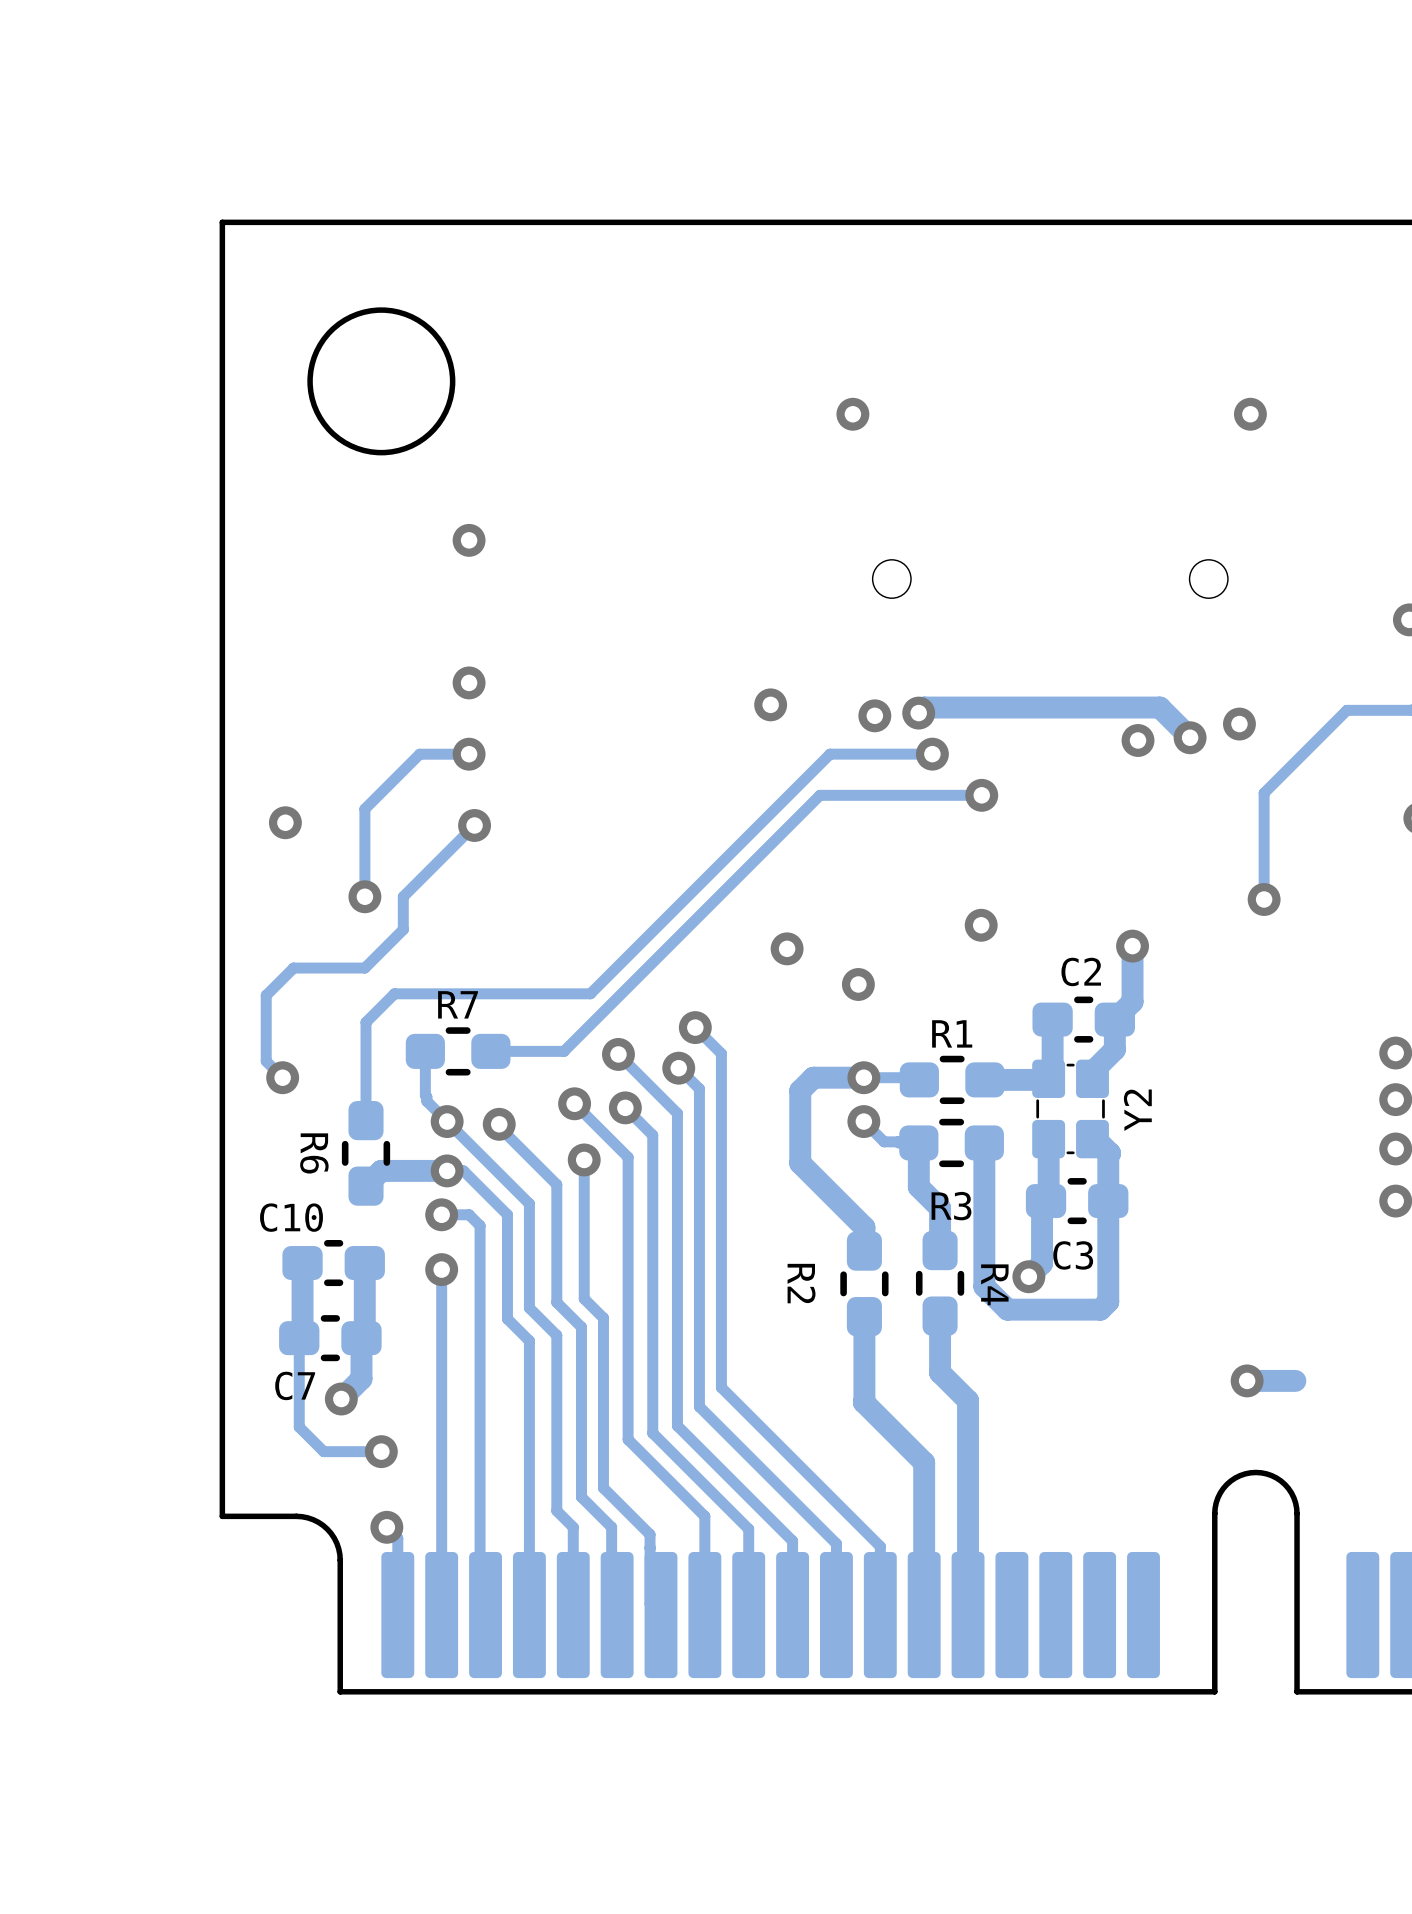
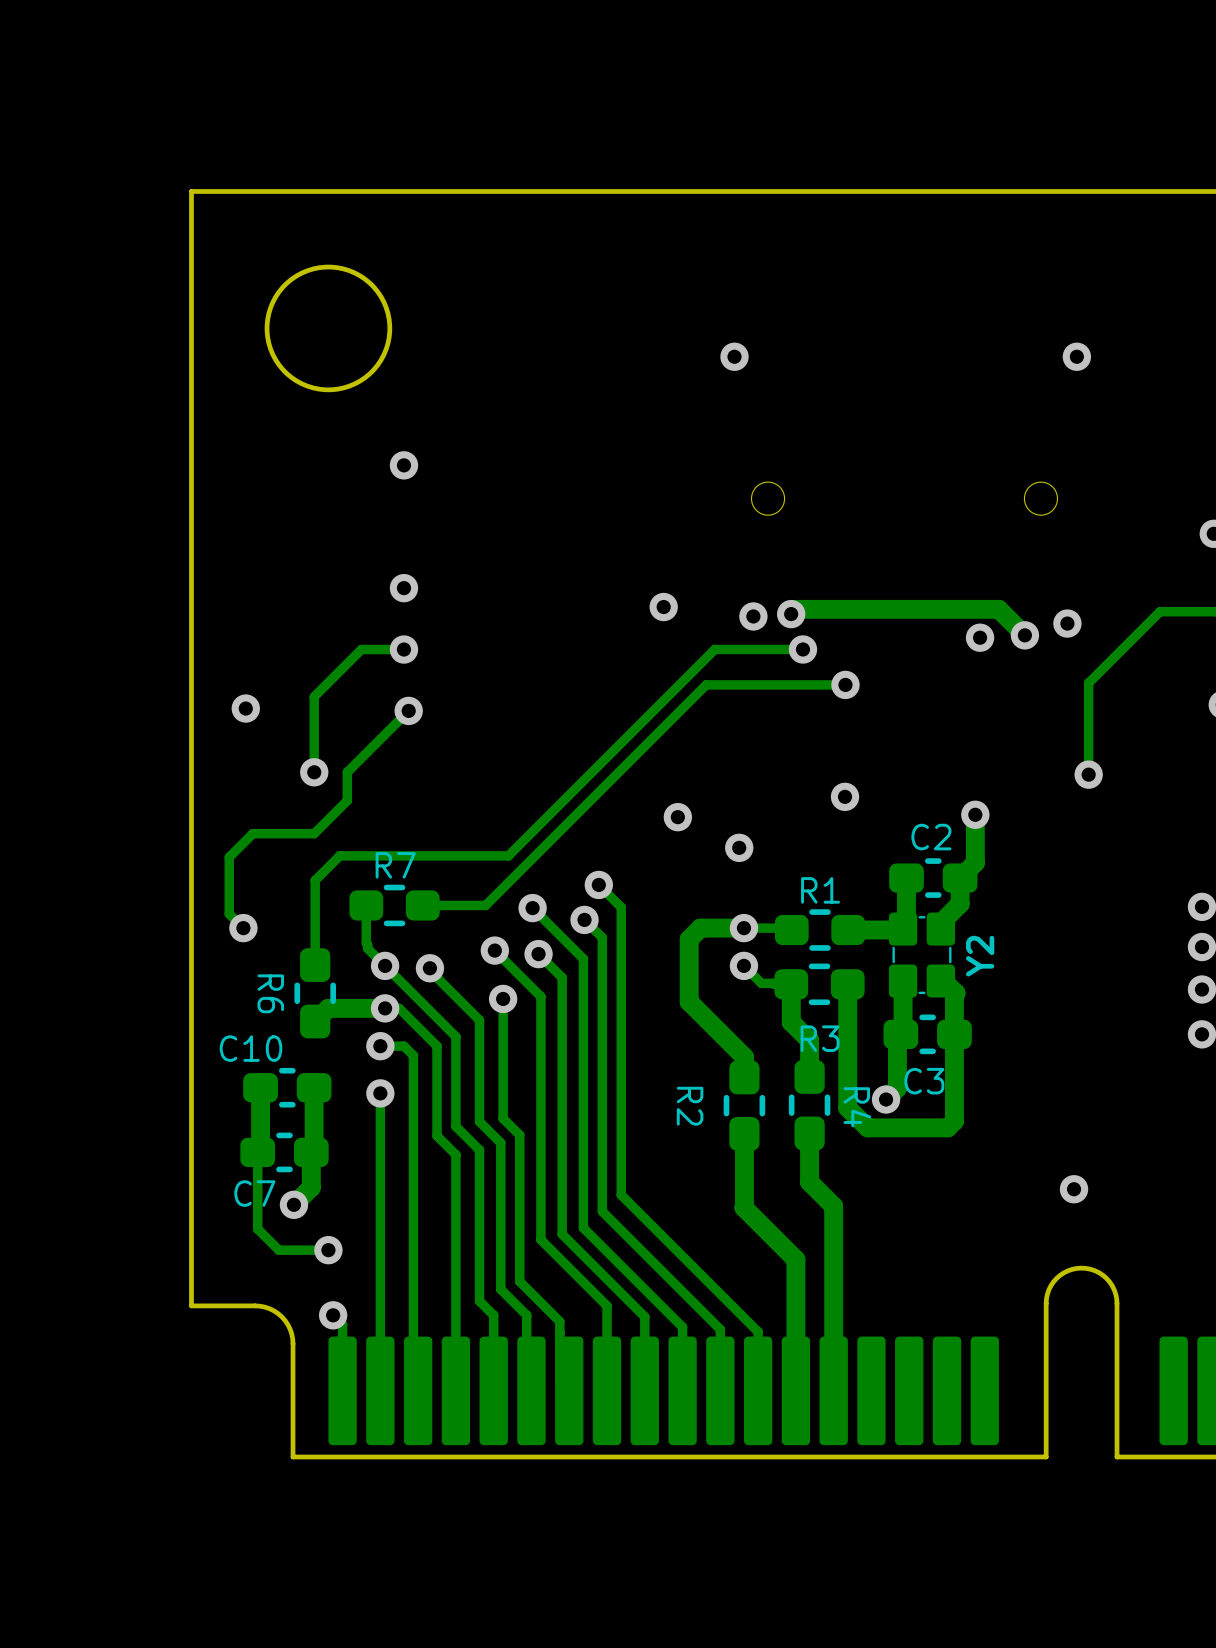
track: (1295, 1380) (1247, 1380) -> none

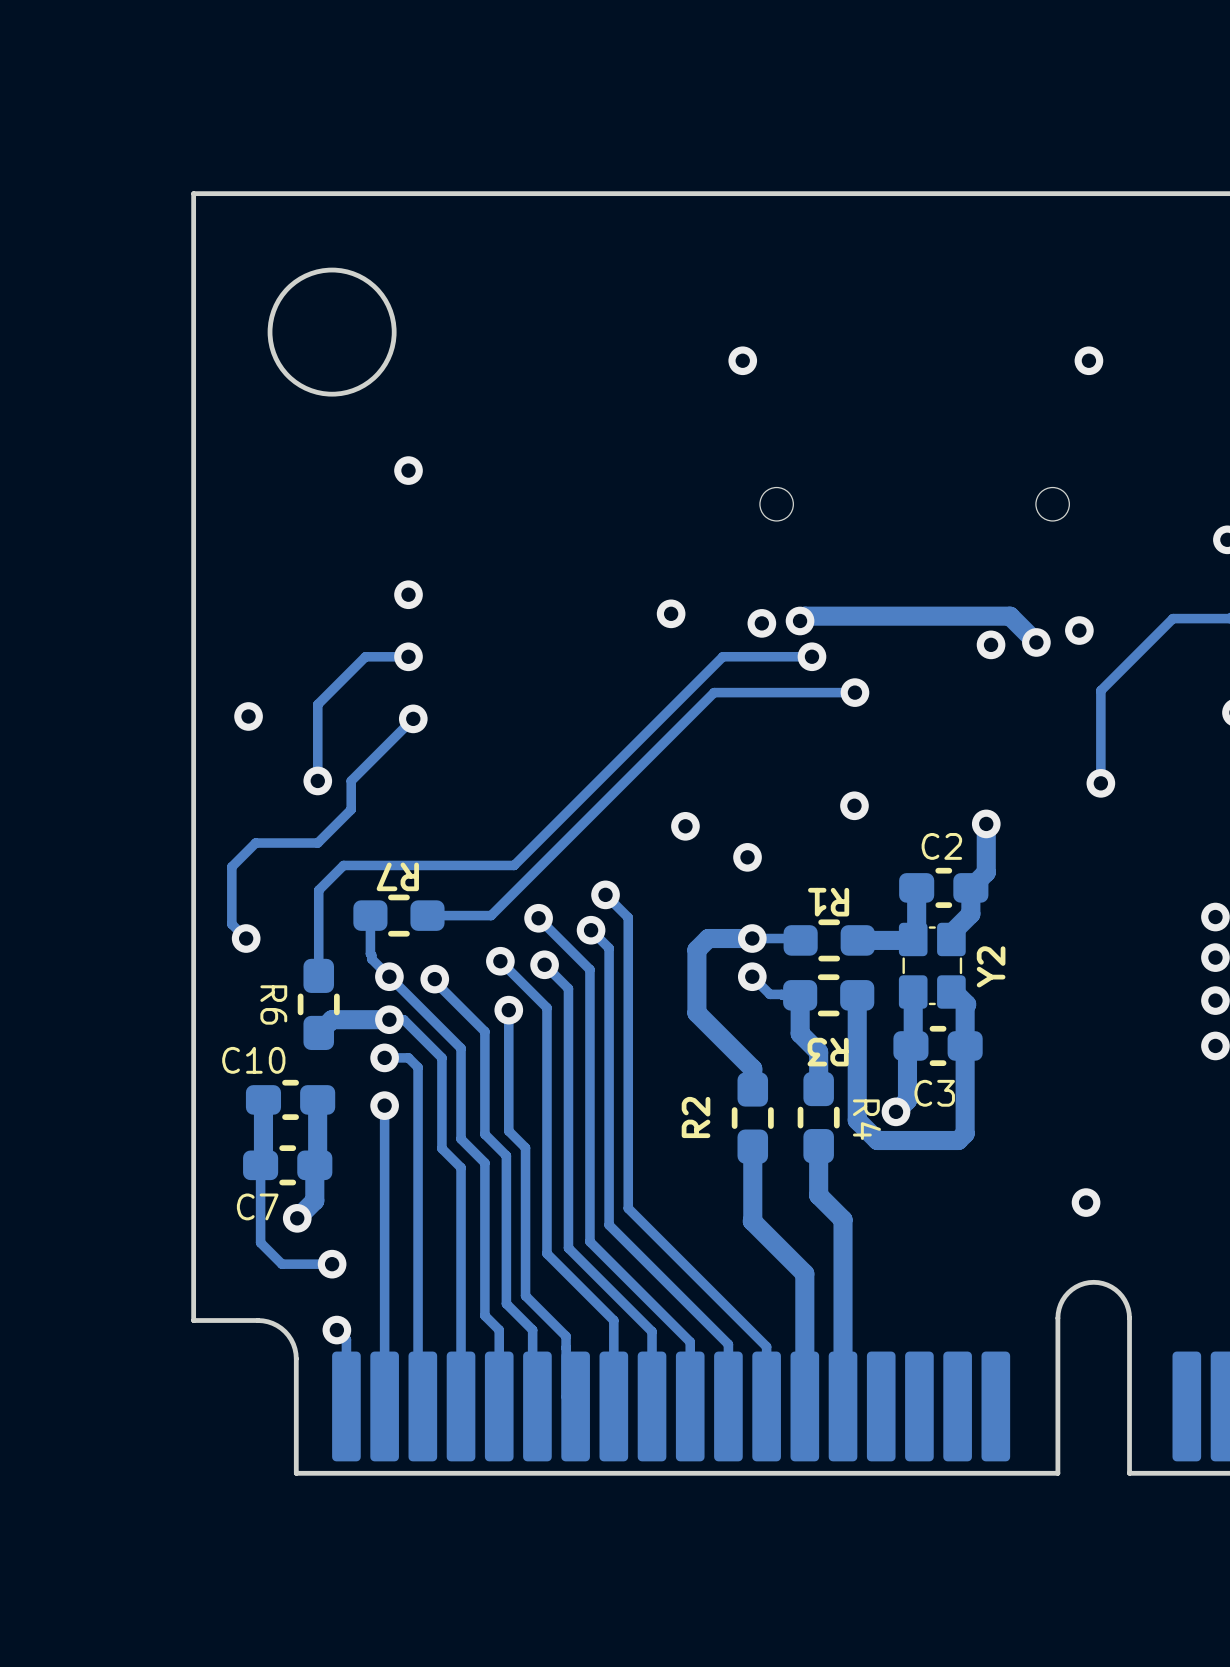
R7 name rotation: 0° (395, 865) -> 180° (397, 876)
R1 name rotation: 0° (820, 890) -> 180° (828, 902)
R3 name rotation: 0° (820, 1038) -> 180° (828, 1052)
R2 name rotation: 0° (690, 1106) -> 180° (696, 1117)

